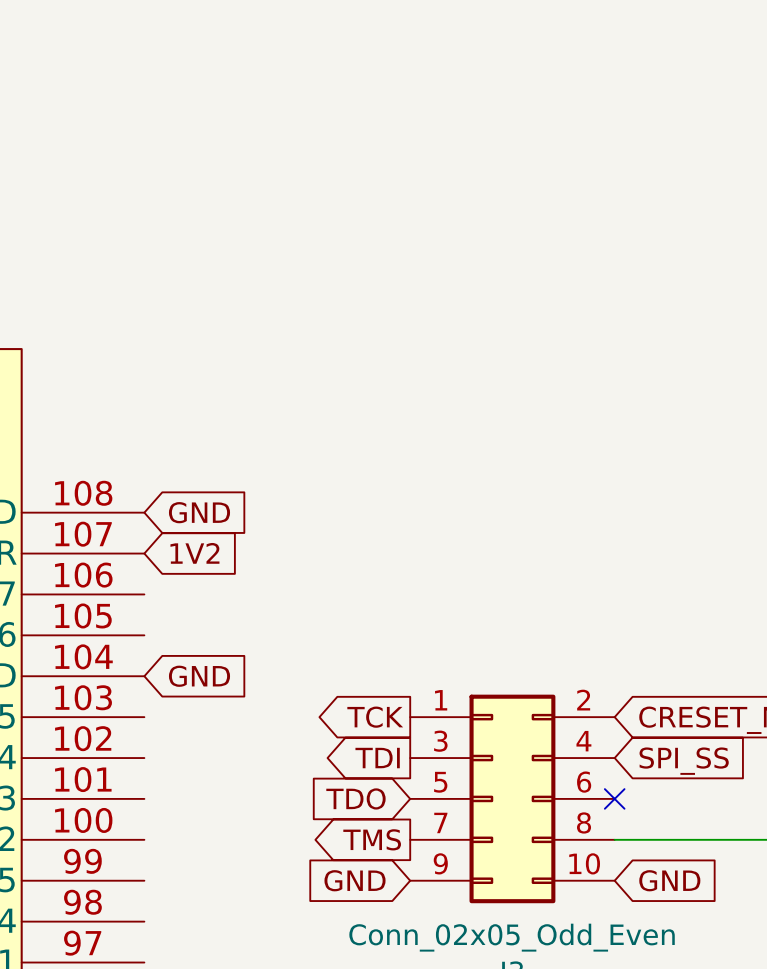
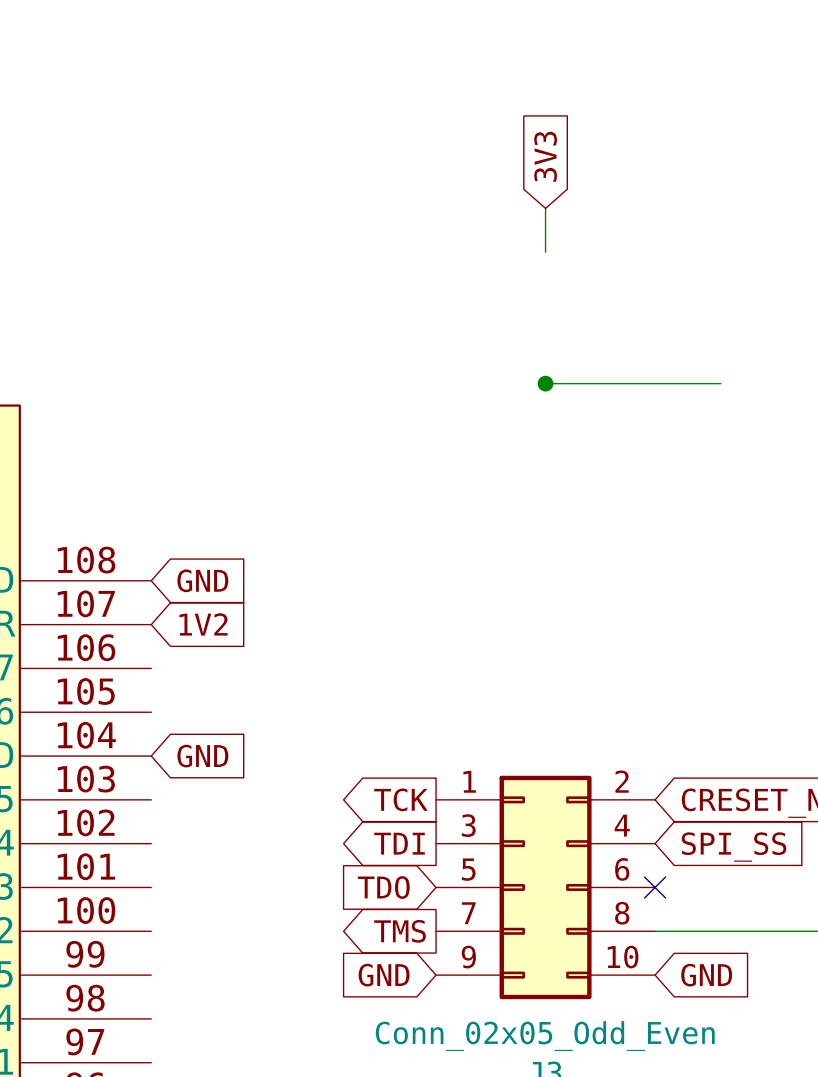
global label: none -> 3V3 (545, 156)
wire: none -> (545, 208) (545, 252)
wire: none -> (545, 383) (720, 383)
junction: none -> (545, 383)

